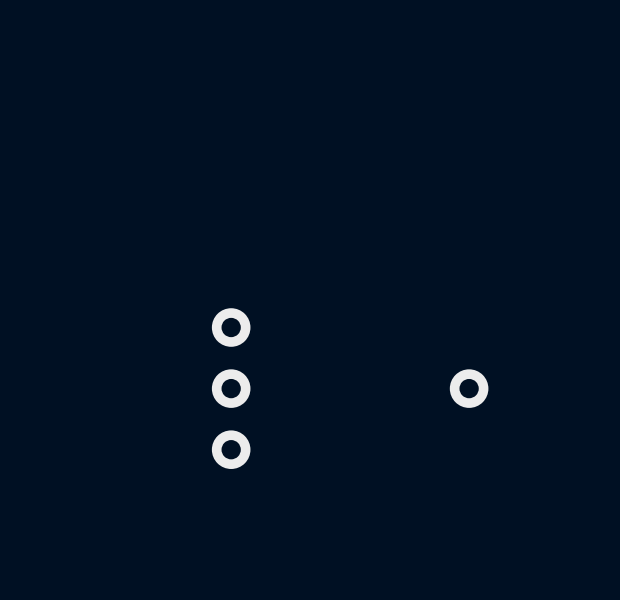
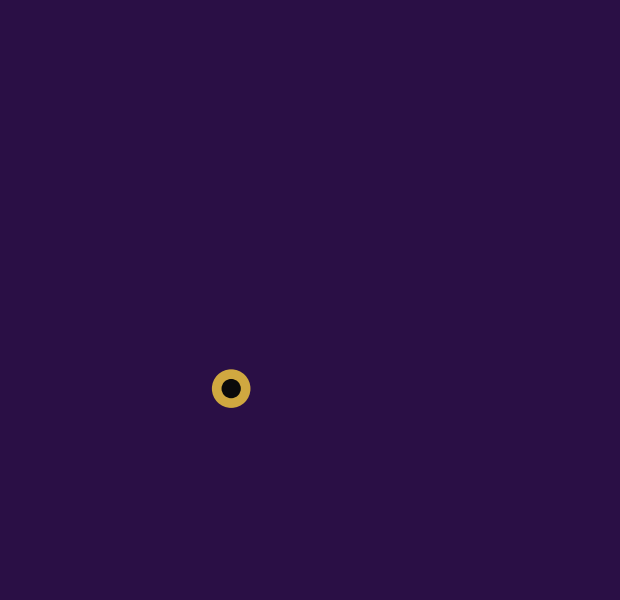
via: (231, 327) -> none
via: (469, 388) -> none
via: (231, 449) -> none

